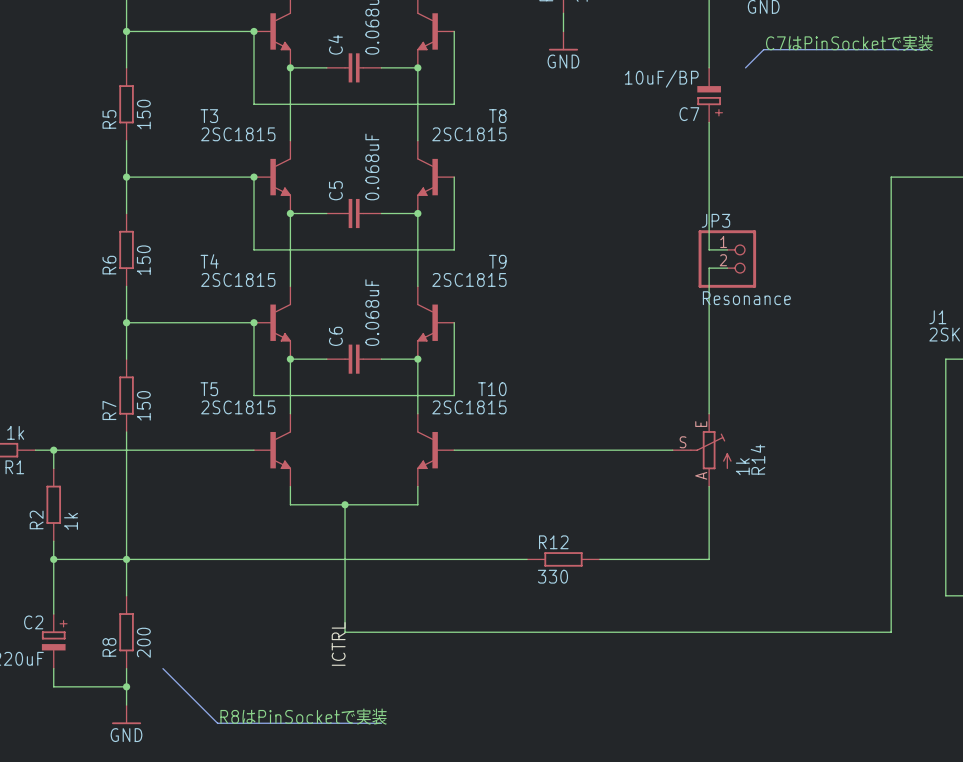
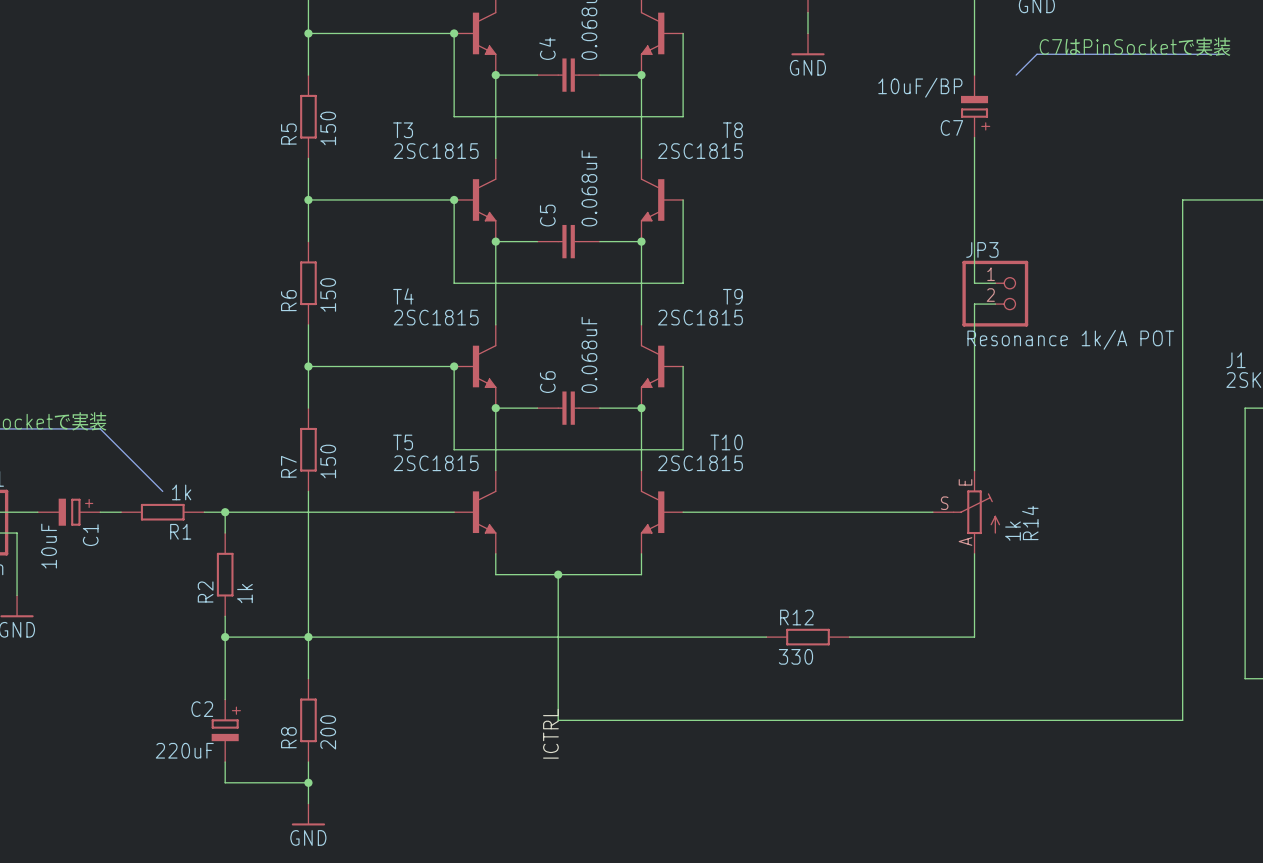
JP3 value: Resonance (746, 298) -> Resonance 1k/A POT (1070, 339)
line: (162, 668) (217, 723) (381, 723) -> none
text: R8はPinSocketで実装 (303, 716) -> none

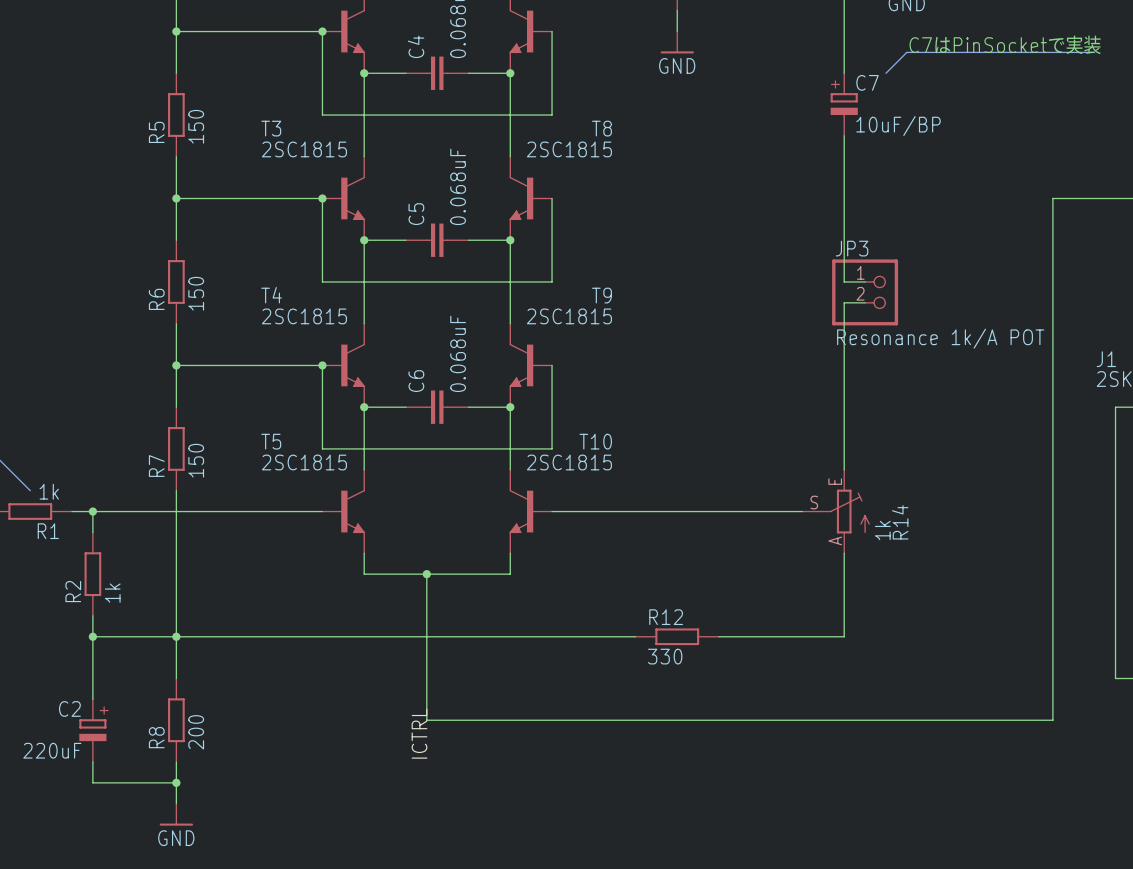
C7 symbol: [960, 75, 989, 138] -> [830, 73, 858, 136]
C7 value position: 10uF/BP (920, 87) -> 10uF/BP (898, 126)
C7 name position: C7 (951, 127) -> C7 (867, 82)

